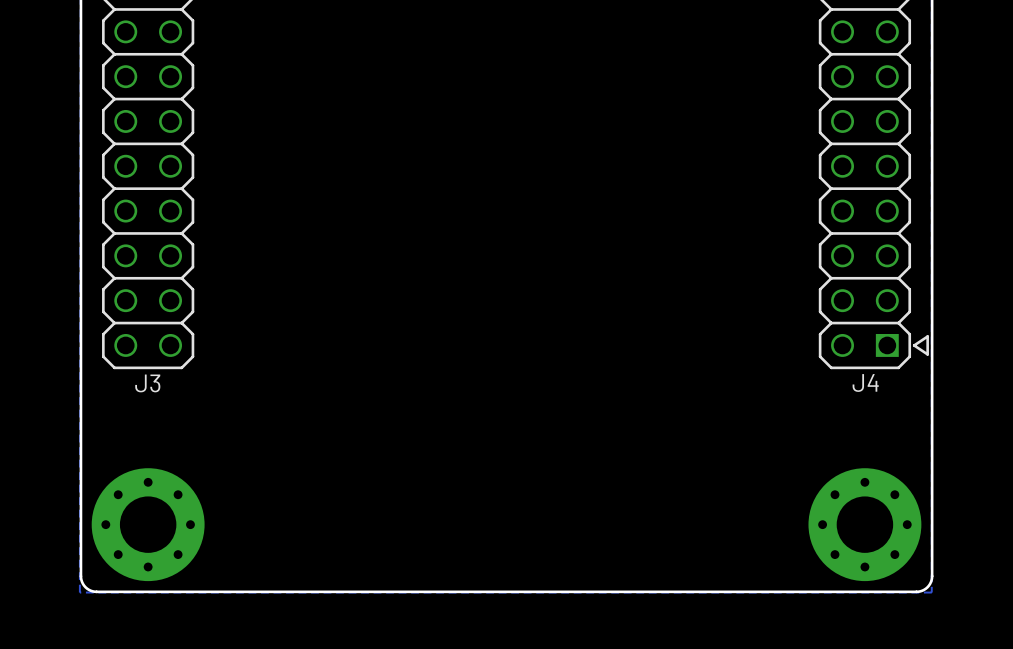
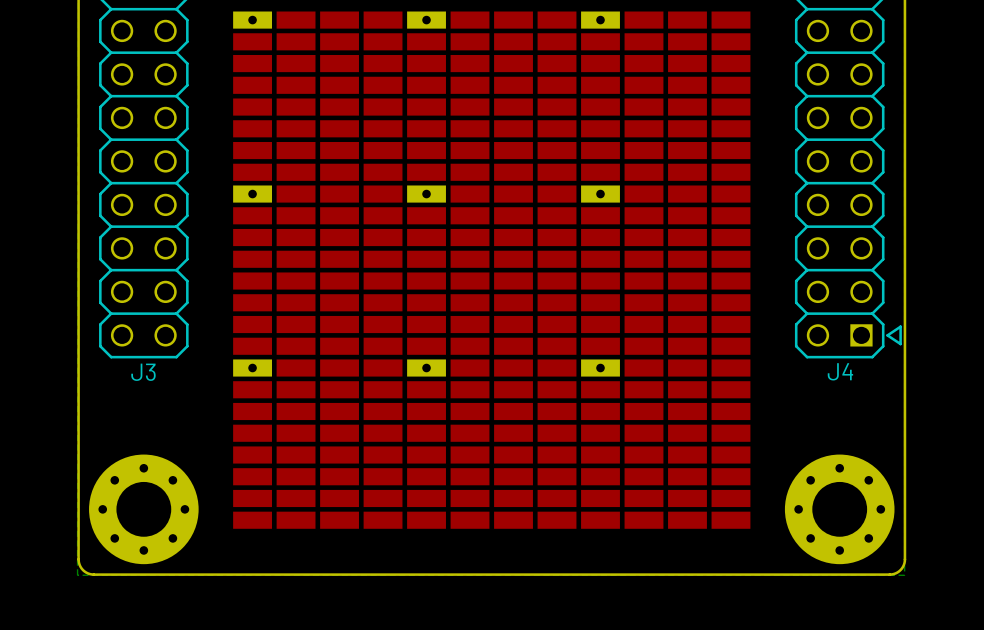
part: none -> (317, 96)
part: none -> (491, 96)
part: none -> (665, 96)
part: none -> (317, 270)
part: none -> (491, 270)
part: none -> (665, 270)
part: none -> (317, 444)
part: none -> (491, 444)
part: none -> (665, 444)

